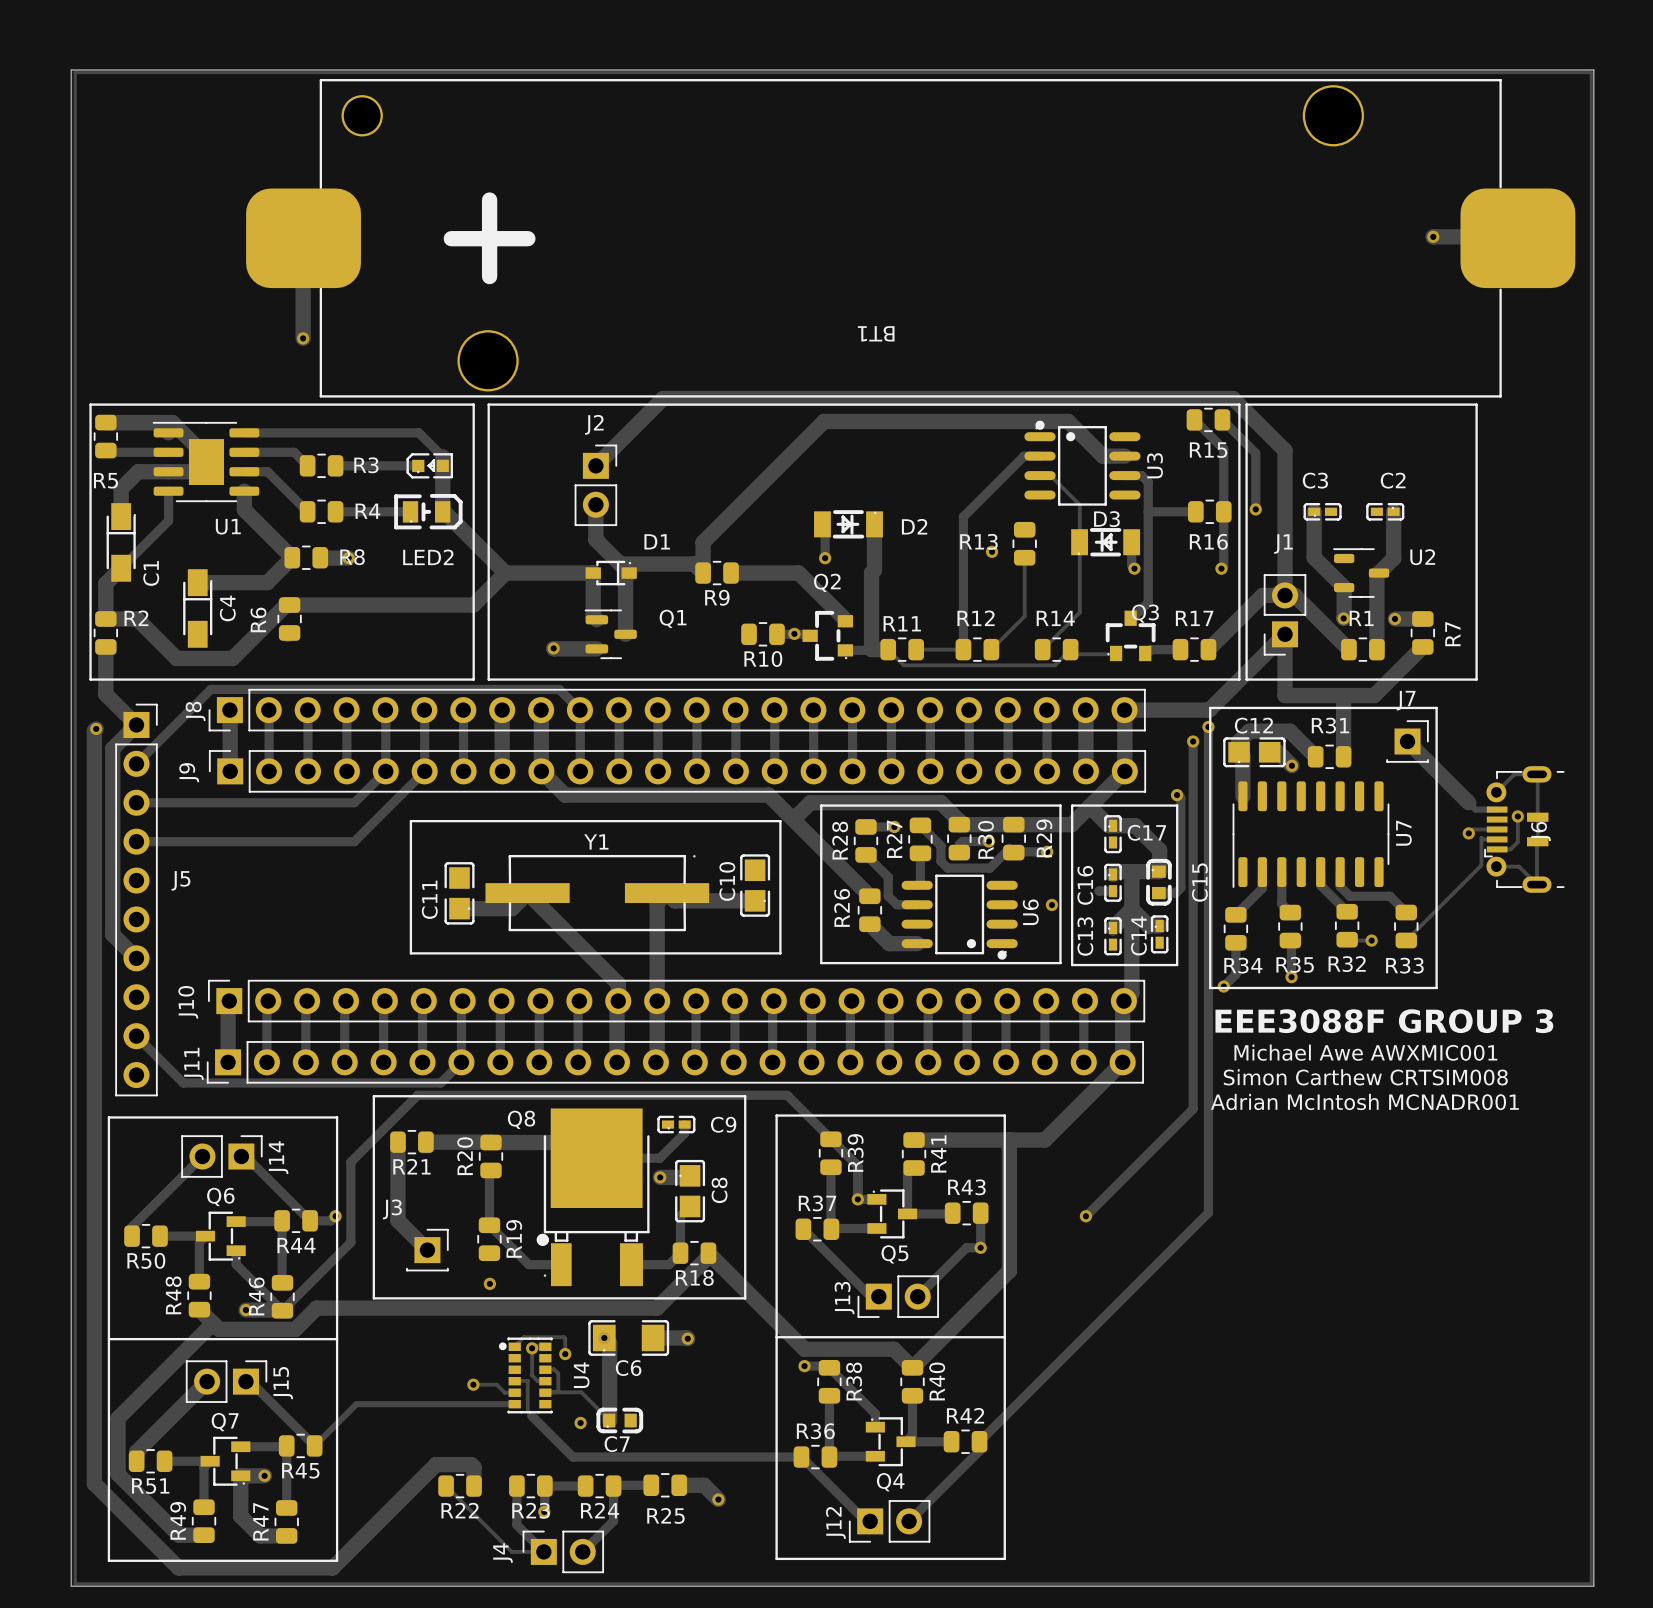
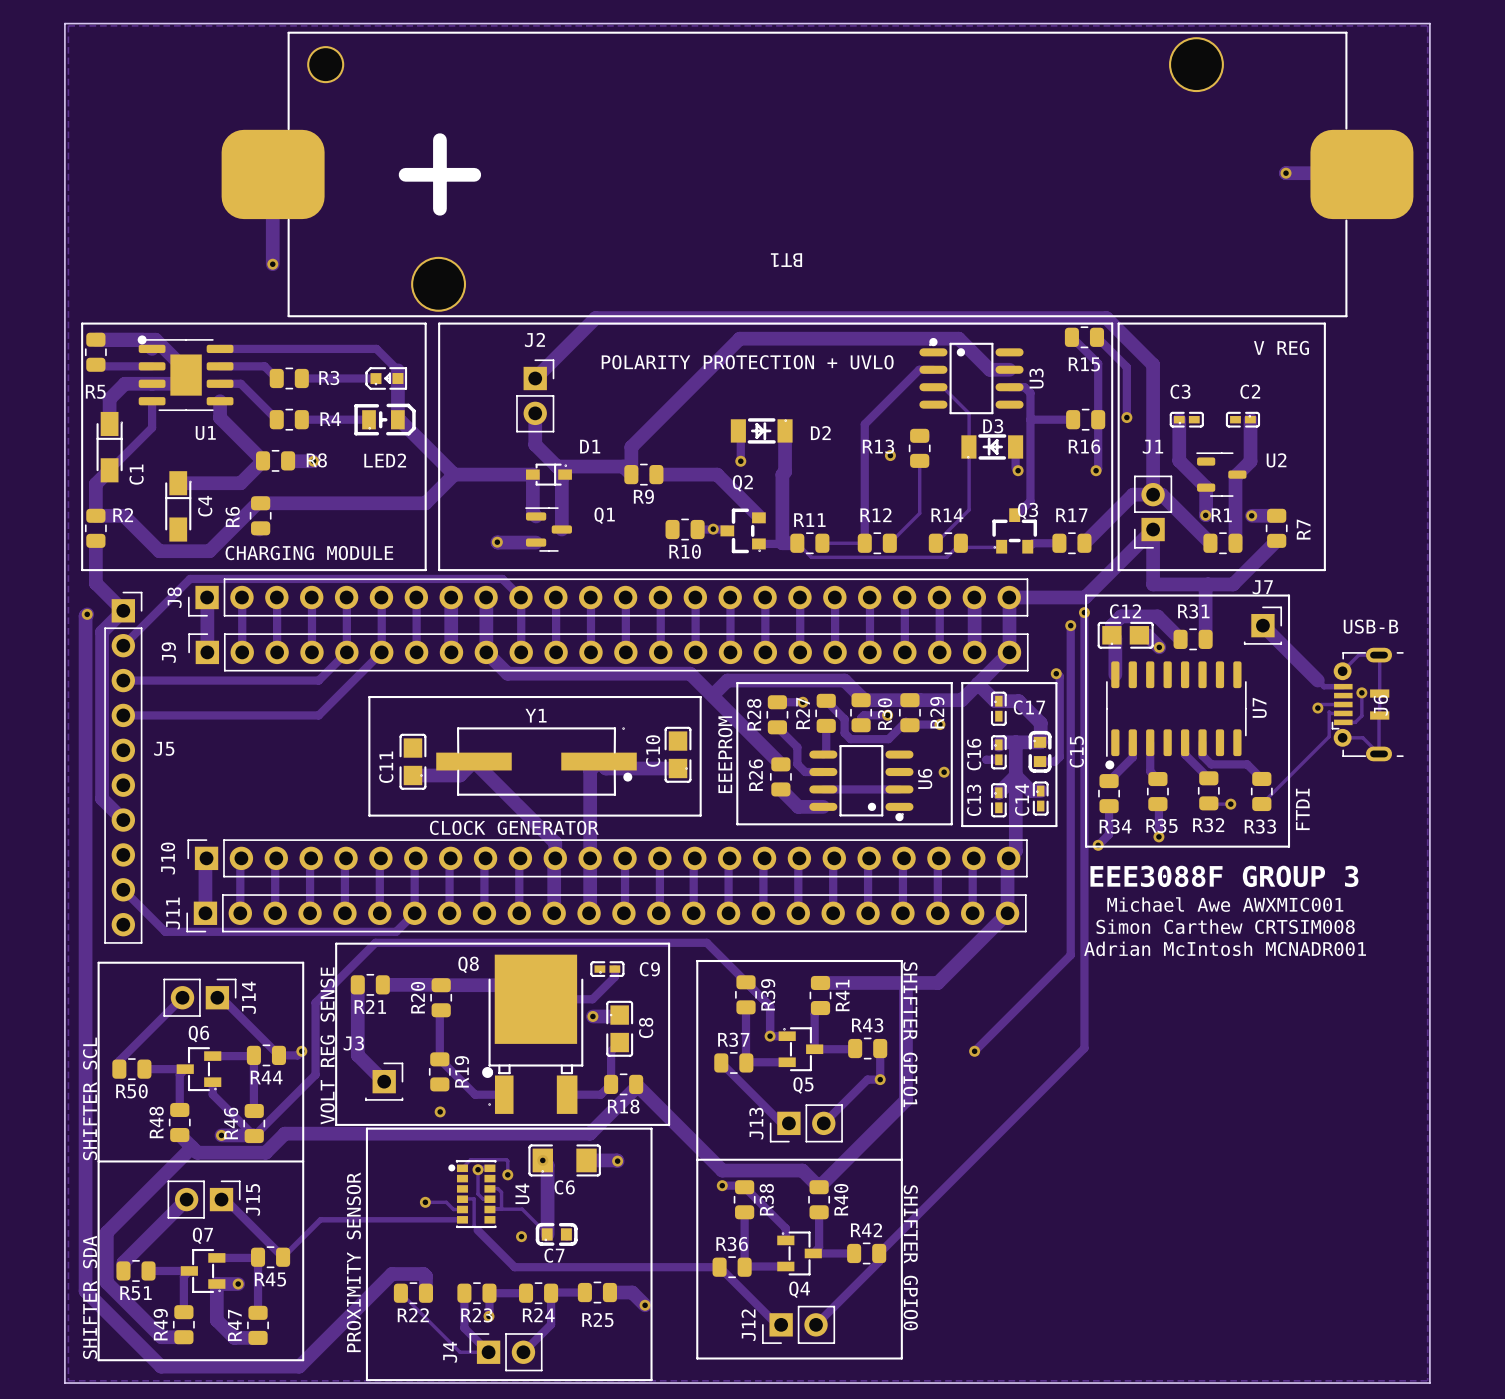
track: (75, 72) (1591, 72) (1591, 1583) (75, 1583) (75, 72) -> none
drawing: none -> [137, 335, 147, 345]
text: none -> V REG (1281, 347)
text: none -> POLARITY PROTECTION + UVLO (747, 362)
text: none -> CHARGING MODULE (309, 553)
text: none -> USB-B (1370, 626)
text: none -> EEEPROM (725, 754)
drawing: none -> [1105, 760, 1115, 770]
drawing: none -> [623, 772, 633, 782]
track: none -> (823, 789) (899, 789)
text: none -> FTDI (1302, 809)
text: none -> CLOCK GENERATOR (514, 827)
text: none -> SHIFTER GPIO1 (910, 1034)
text: none -> VOLT REG SENSE (327, 1045)
text: none -> SHIFTER SCL (90, 1098)
line: none -> (366, 1128) (651, 1128) (651, 1380) (366, 1380) (366, 1128)
text: none -> SHIFTER GPIO0 (910, 1257)
text: none -> PROXIMITY SENSOR (353, 1262)
text: none -> SHIFTER SDA (90, 1297)

